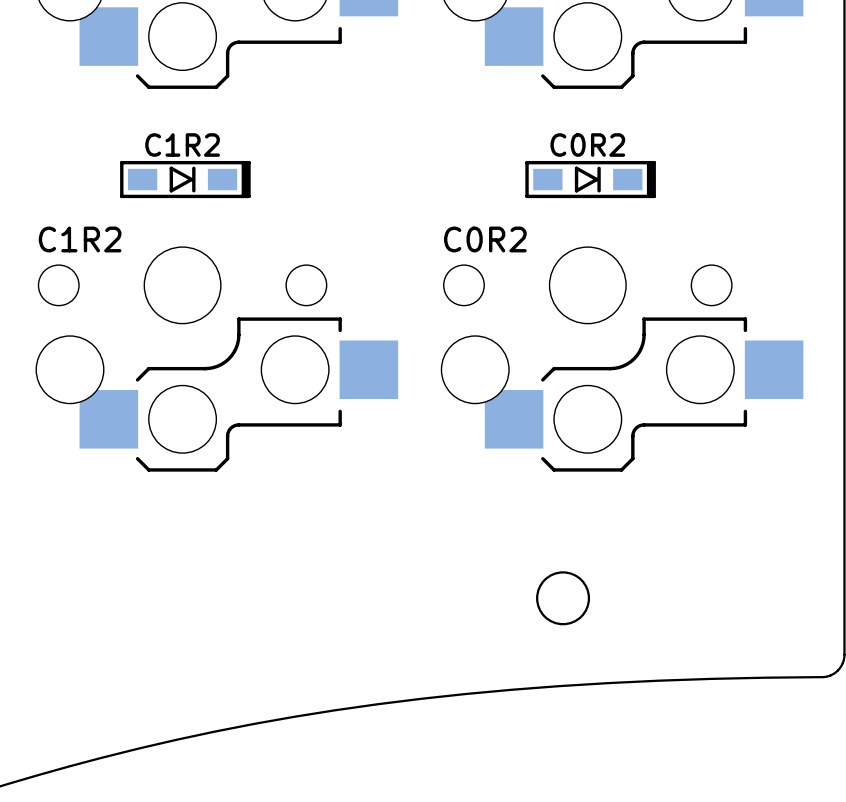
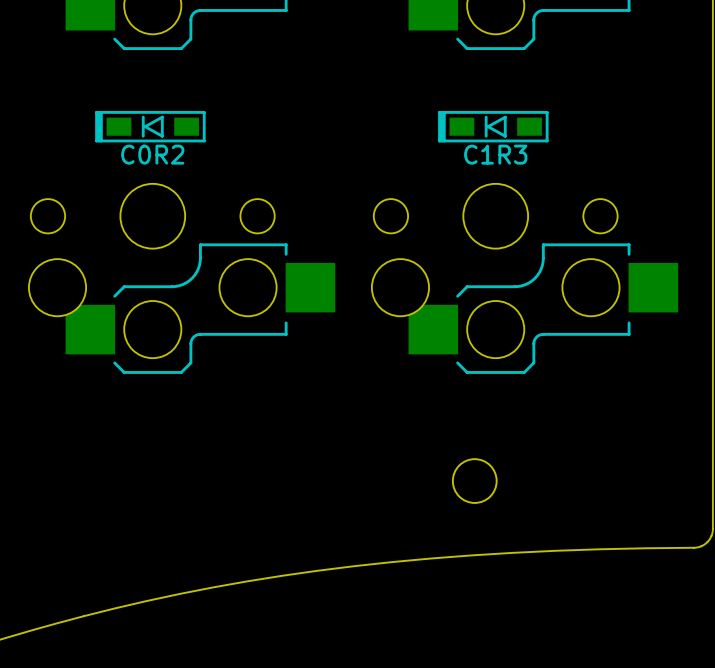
part footprint: [120, 160, 251, 199] -> [95, 110, 206, 143]
part footprint: [525, 160, 656, 199] -> [438, 110, 549, 143]
part text: C1R2 (80, 239) -> none
part text: C0R2 (485, 239) -> none

